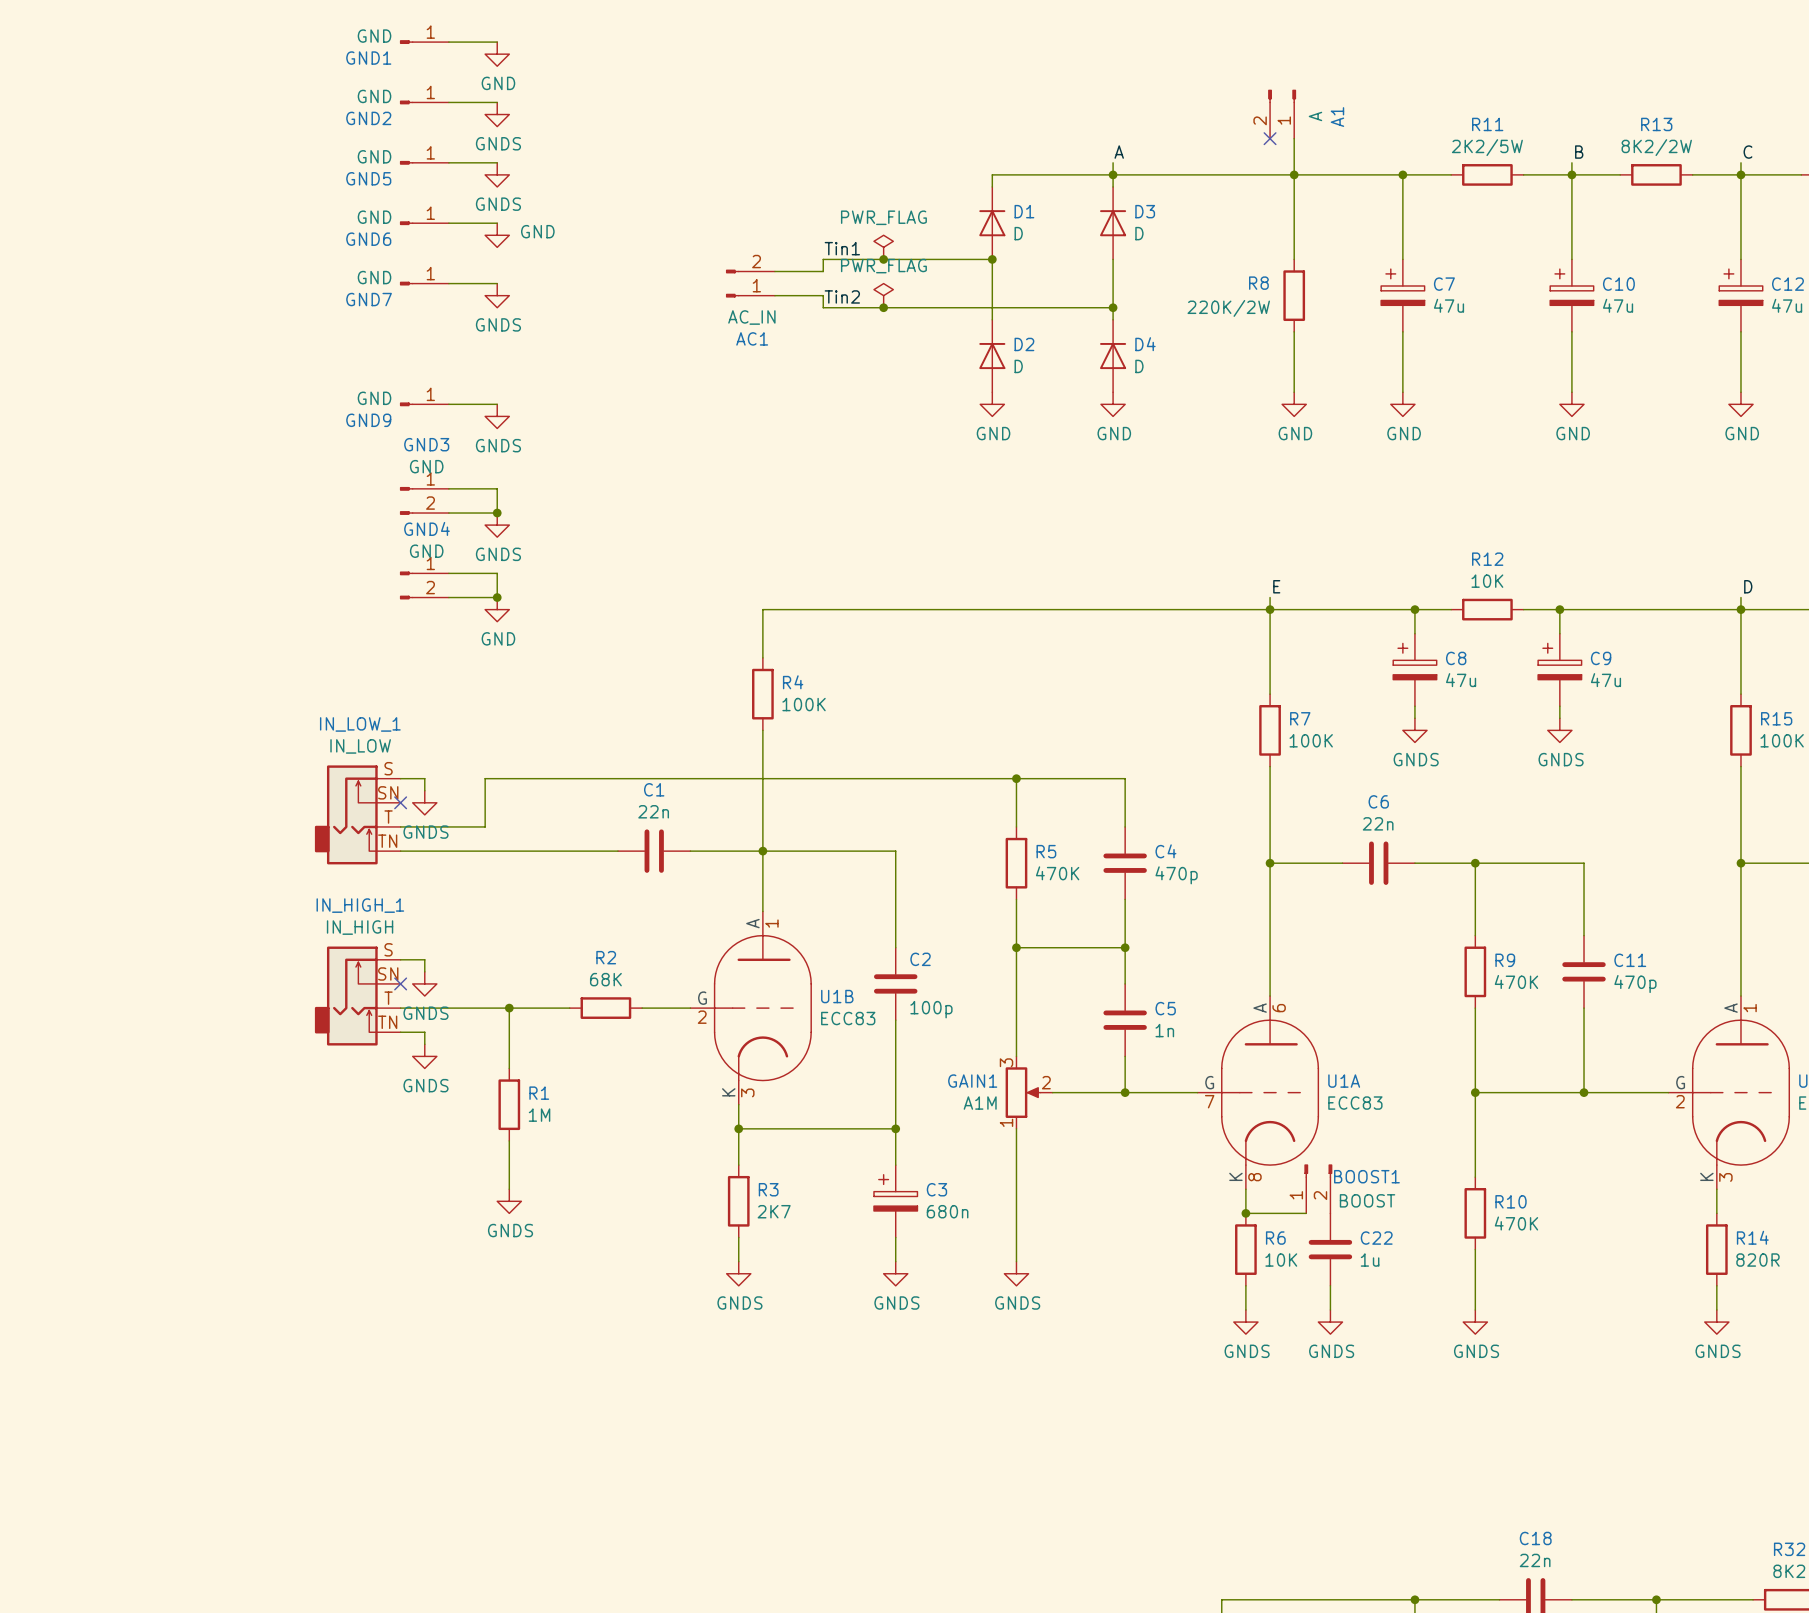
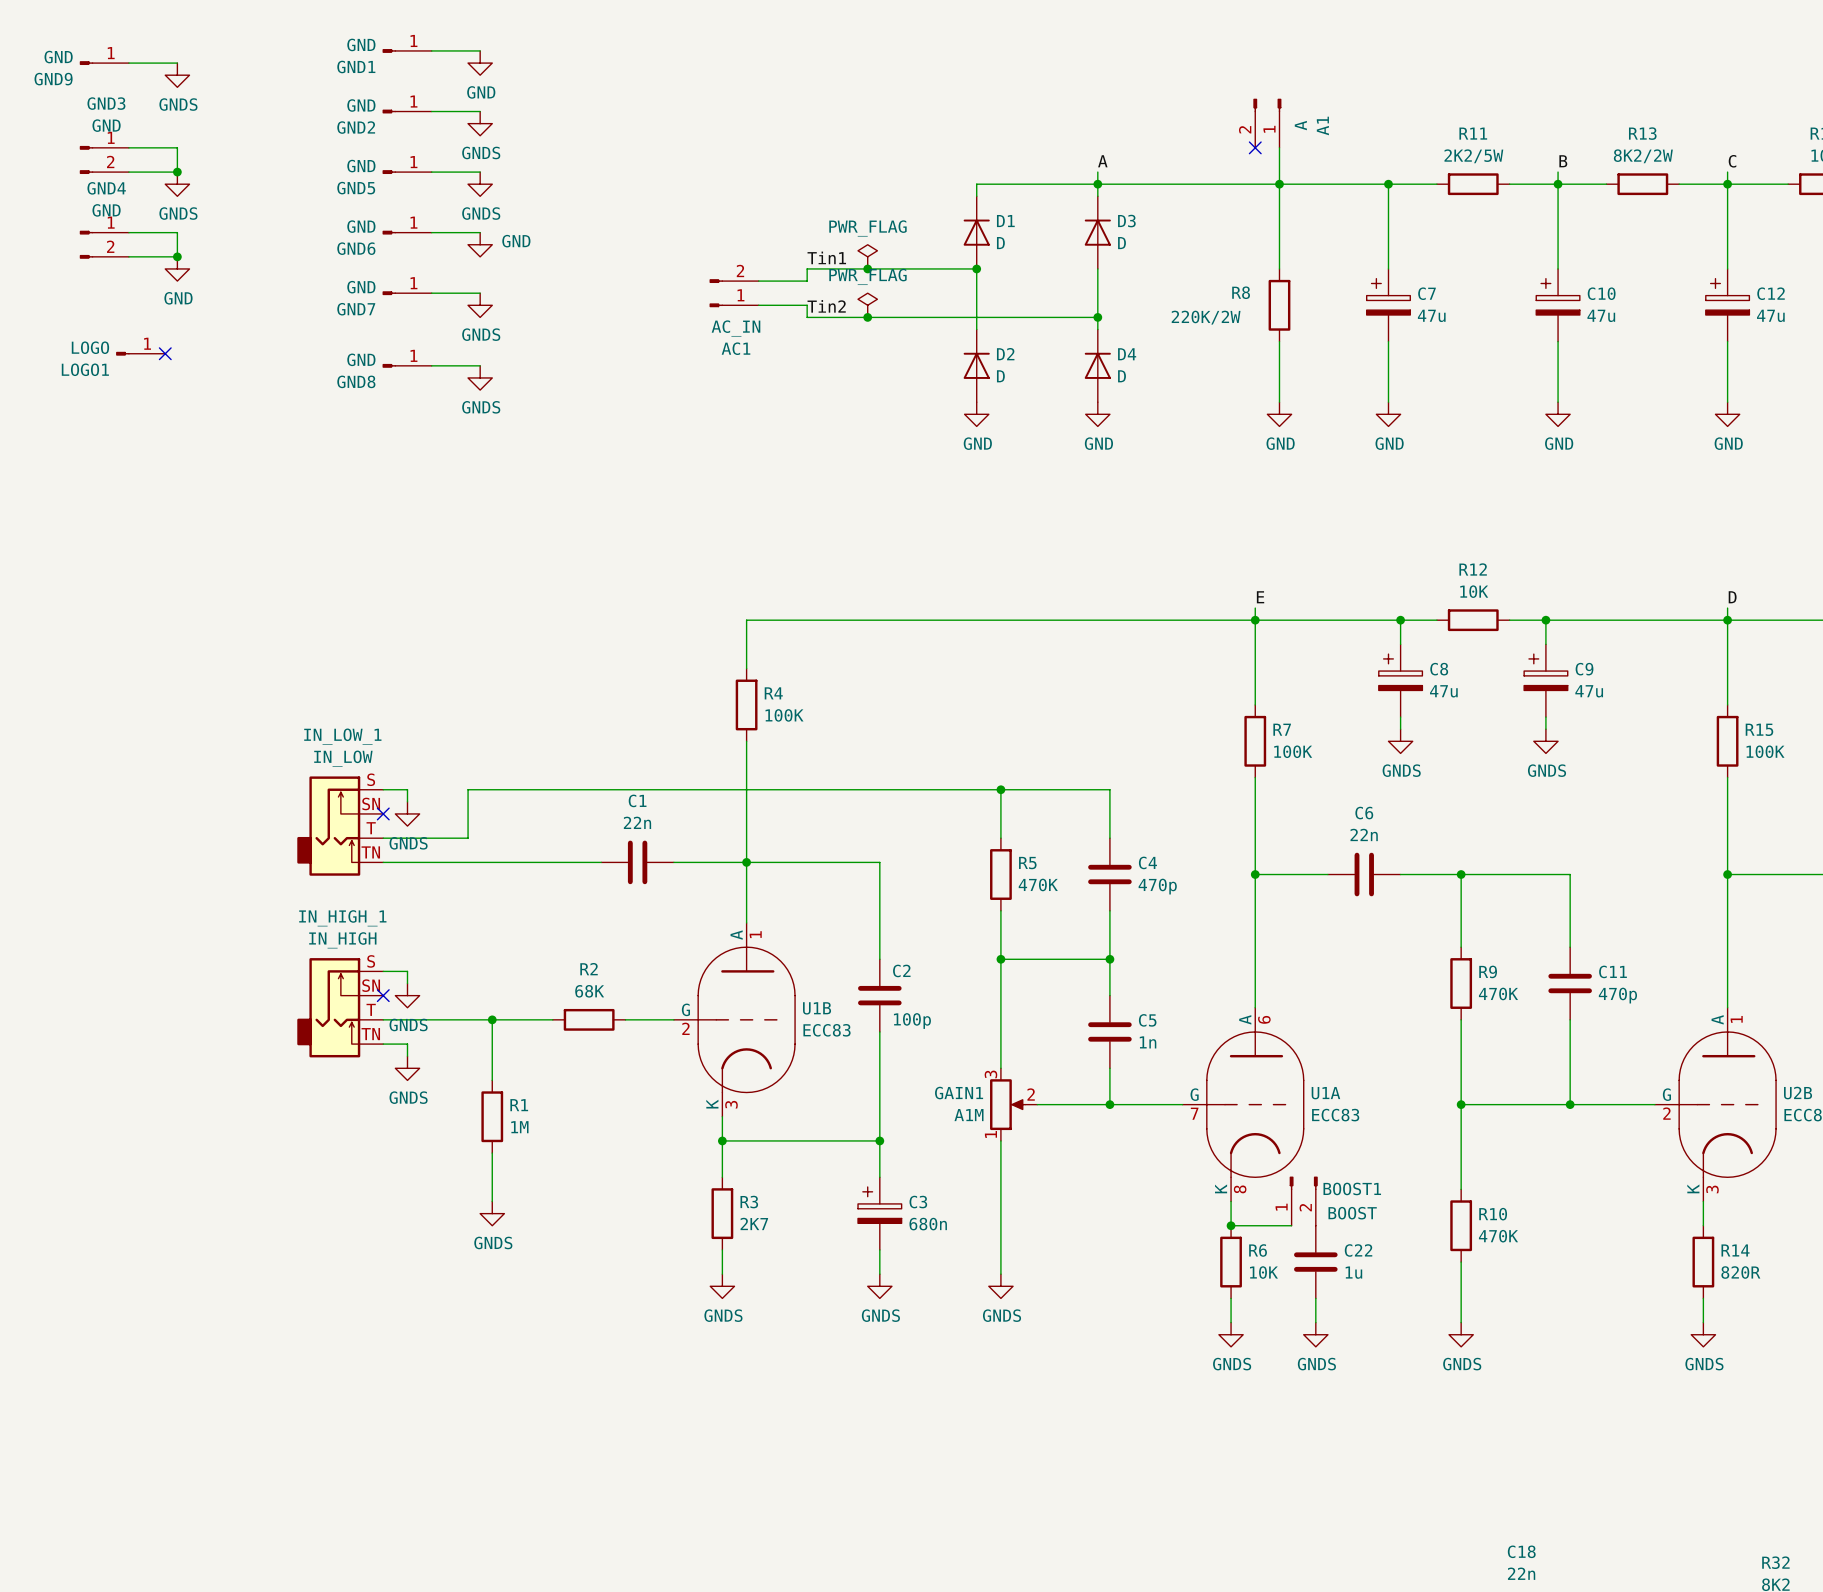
wire: none -> (128, 63) (177, 63)
power symbol: none -> GNDS (177, 75)
wire: none -> (128, 147) (177, 147) (177, 172) (128, 172)
junction: none -> (177, 172)
power symbol: none -> GNDS (177, 184)
wire: none -> (128, 232) (177, 232) (177, 256) (128, 256)
junction: none -> (177, 256)
power symbol: none -> GND (177, 268)
LOGO1: none -> LOGO (140, 353)
no-connect mark: none -> (165, 353)
GND8: none -> GND (407, 365)
GND9 position: (424, 404) -> (104, 63)
wire: (448, 404) (497, 404) -> (431, 365) (480, 365)
power symbol position: GNDS (497, 416) -> GNDS (480, 377)
wire: (448, 488) (497, 488) (497, 513) (448, 513) -> none
GND3 position: (424, 500) -> (104, 159)
junction: (497, 513) -> none
power symbol: GNDS (497, 525) -> none
wire: (448, 573) (497, 573) (497, 597) (448, 597) -> none
GND4 position: (424, 585) -> (104, 244)
junction: (497, 597) -> none
power symbol: GND (497, 609) -> none

